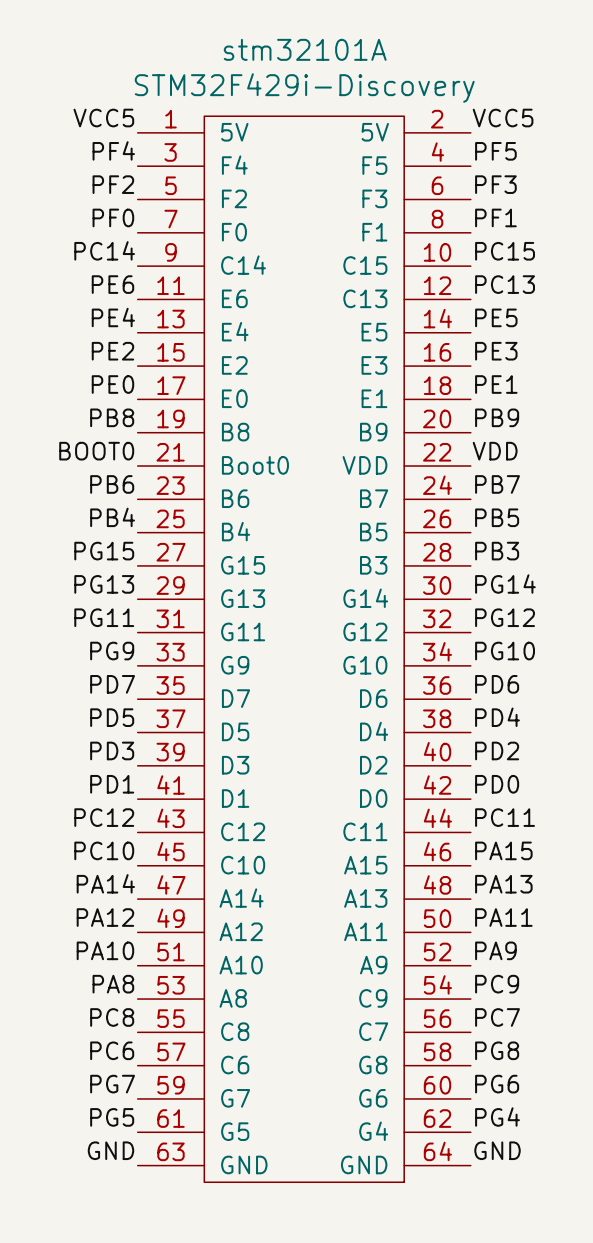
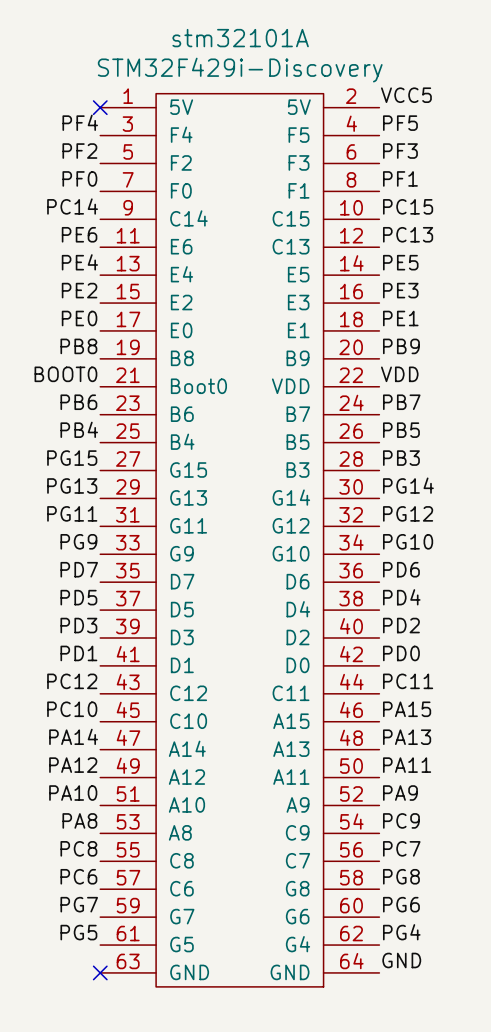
label: VCC5 (103, 118) -> none
no-connect mark: none -> (100, 107)
label: GND (110, 1150) -> none
no-connect mark: none -> (100, 972)

